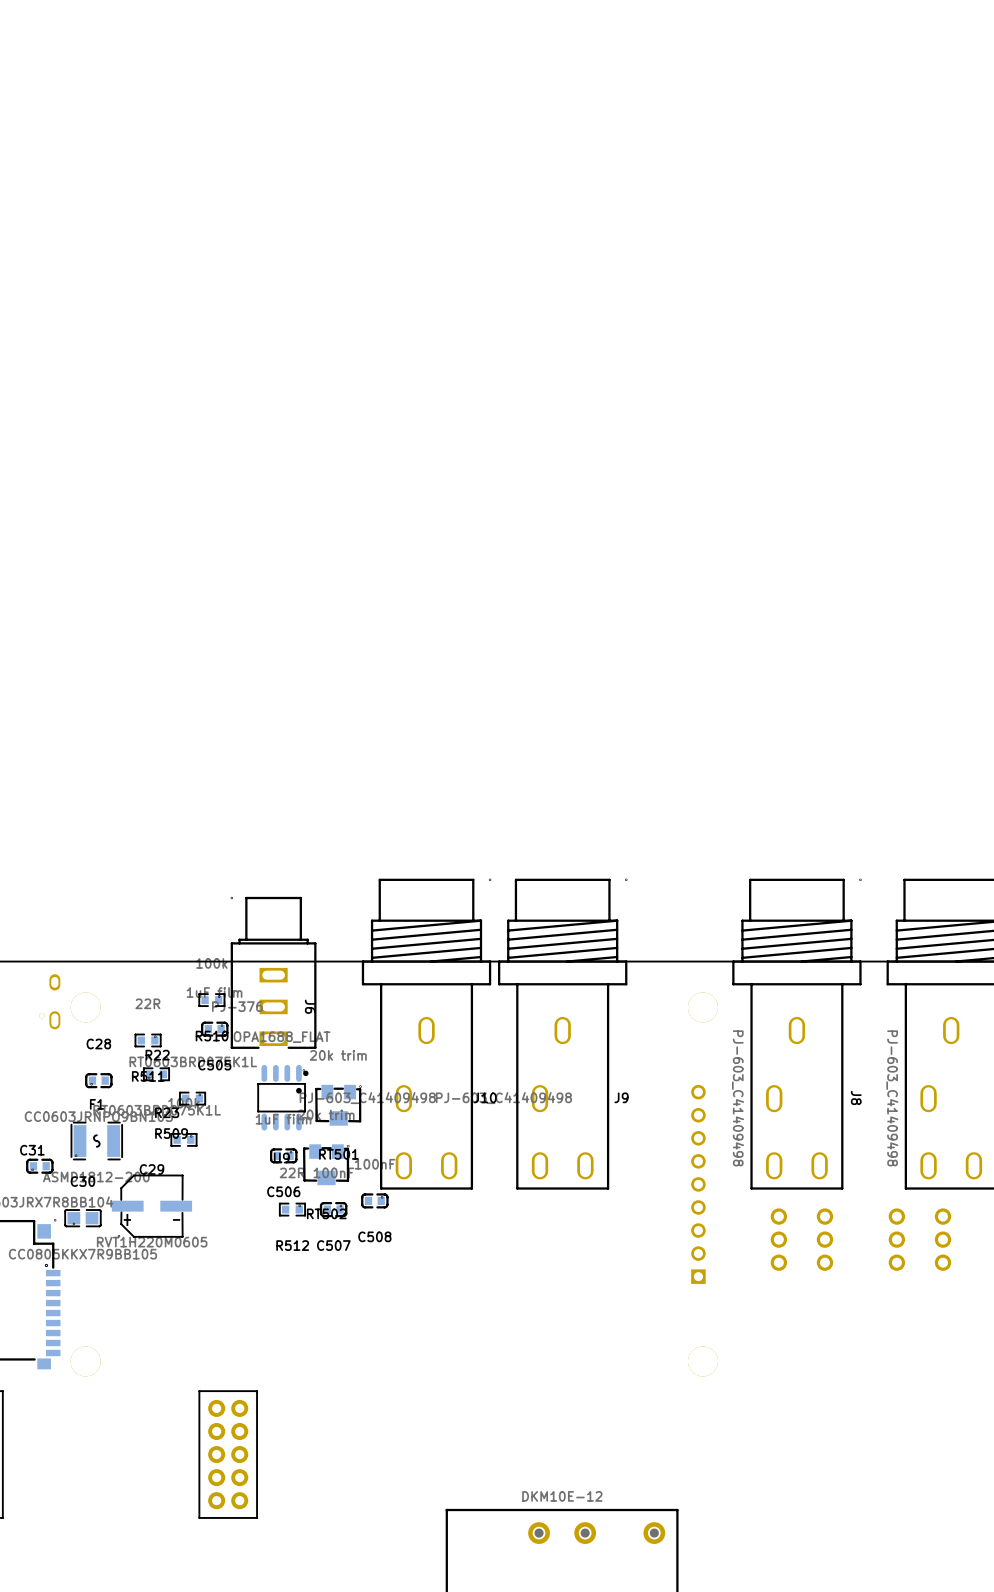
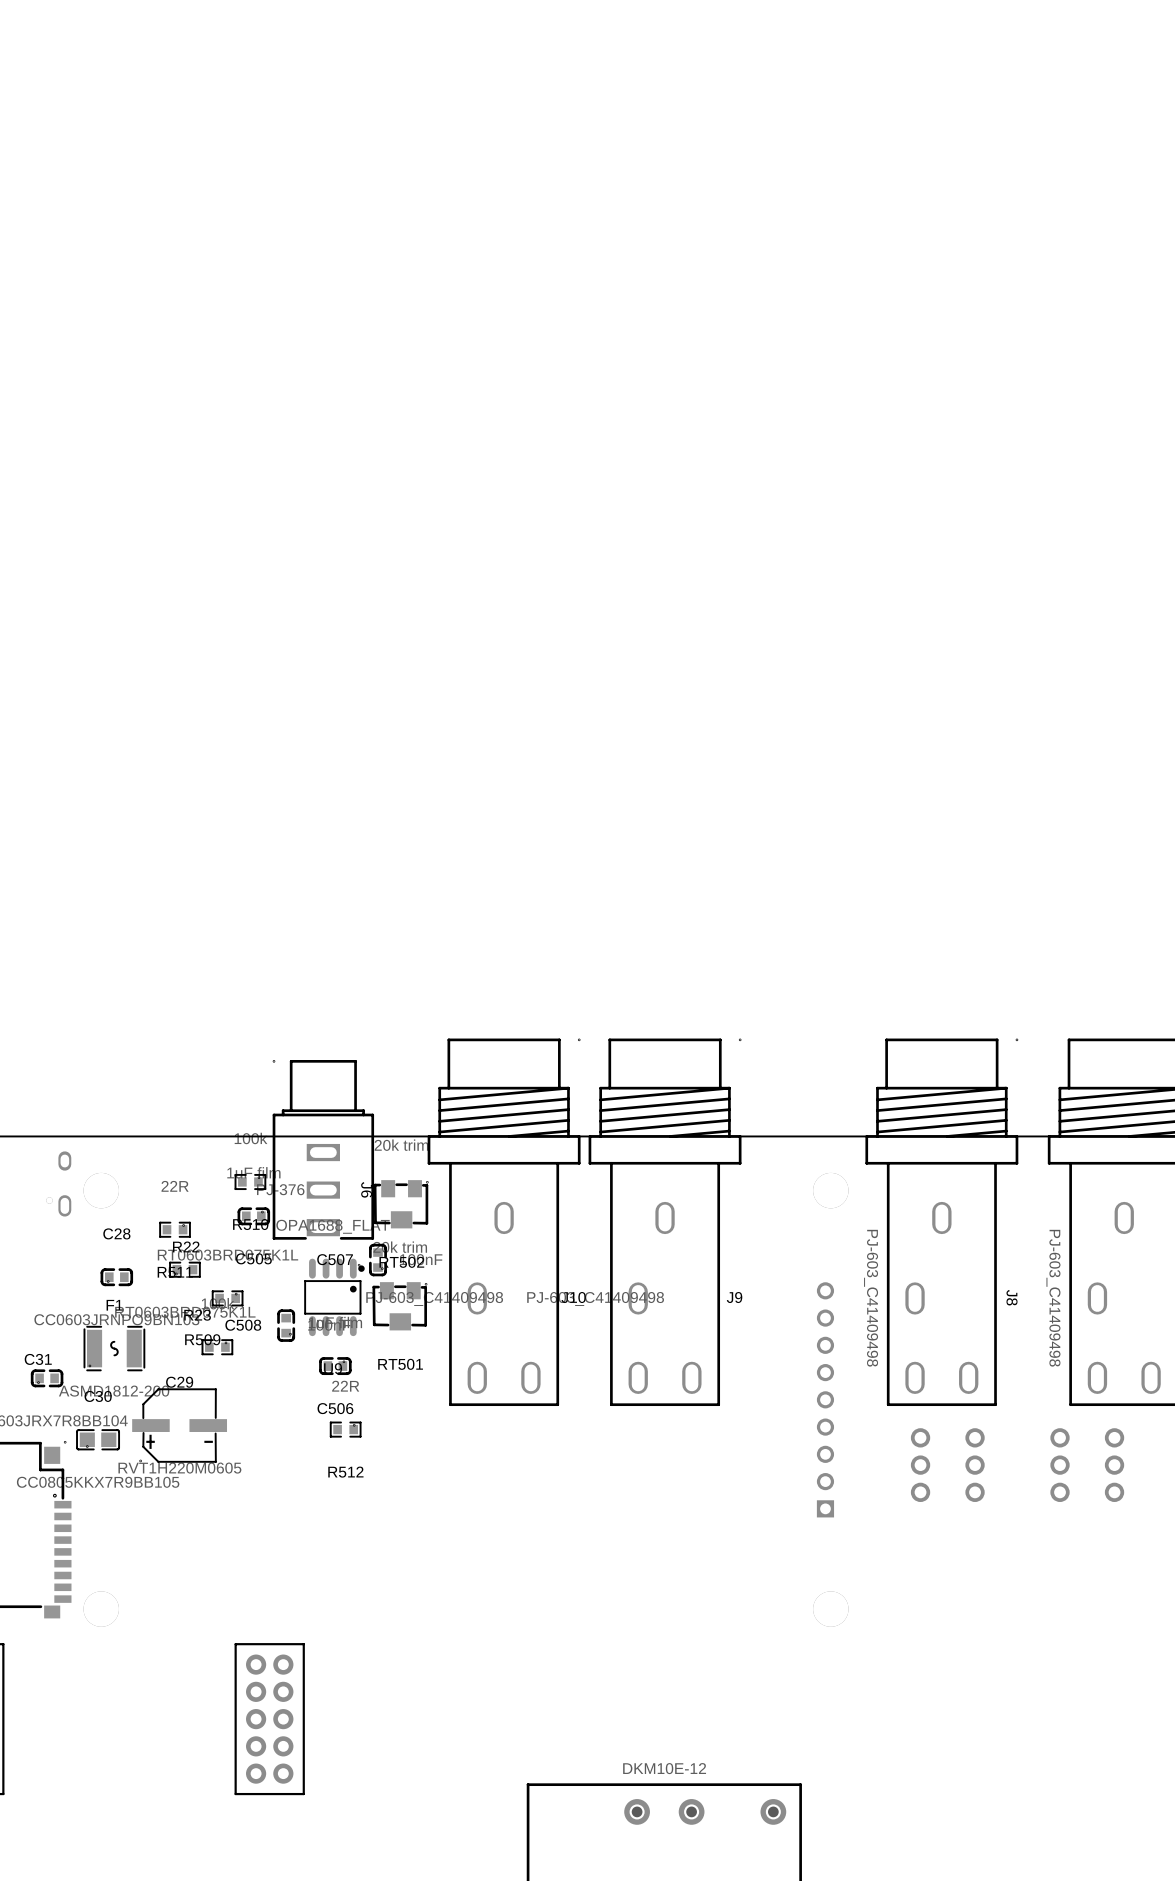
RT502 position: (326, 1164) -> (401, 1204)
C508 rotation: 0° (374, 1200) -> 90° clockwise (286, 1325)
C508 position: (374, 1200) -> (286, 1325)
C507 rotation: 0° (333, 1209) -> 90° clockwise (377, 1260)
C507 position: (333, 1209) -> (377, 1260)

